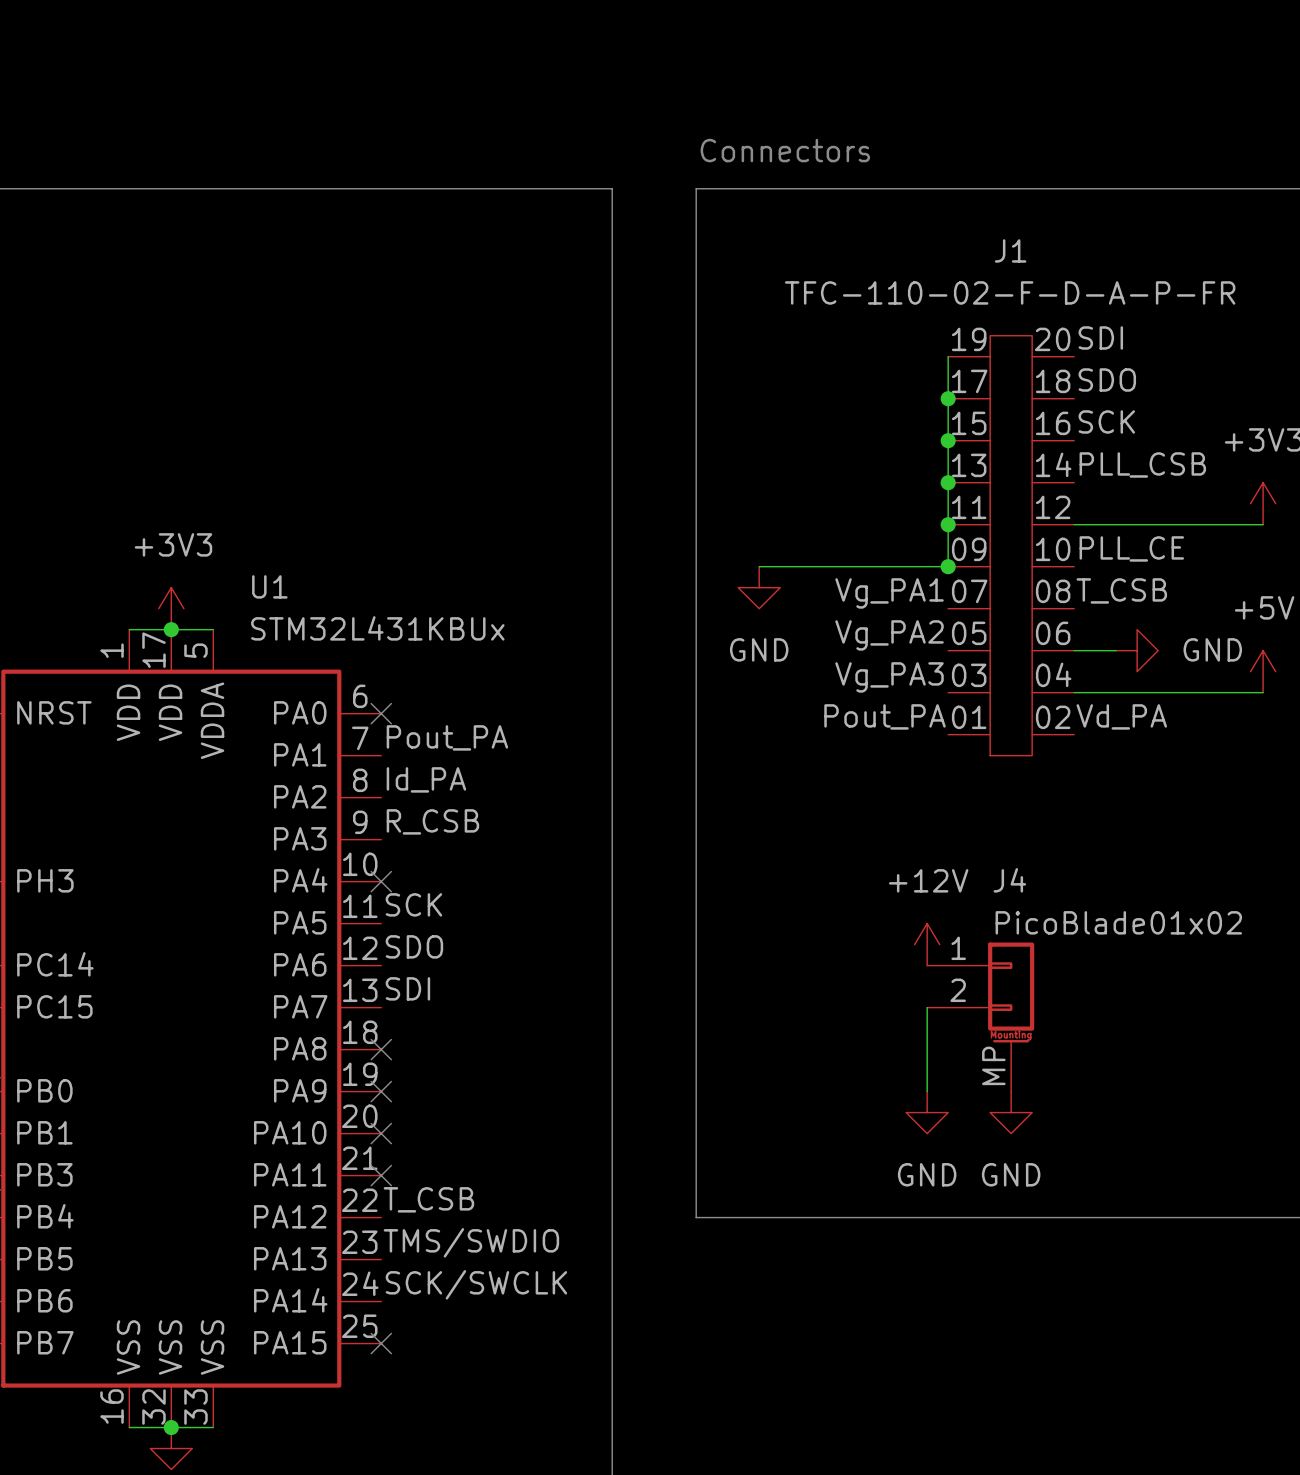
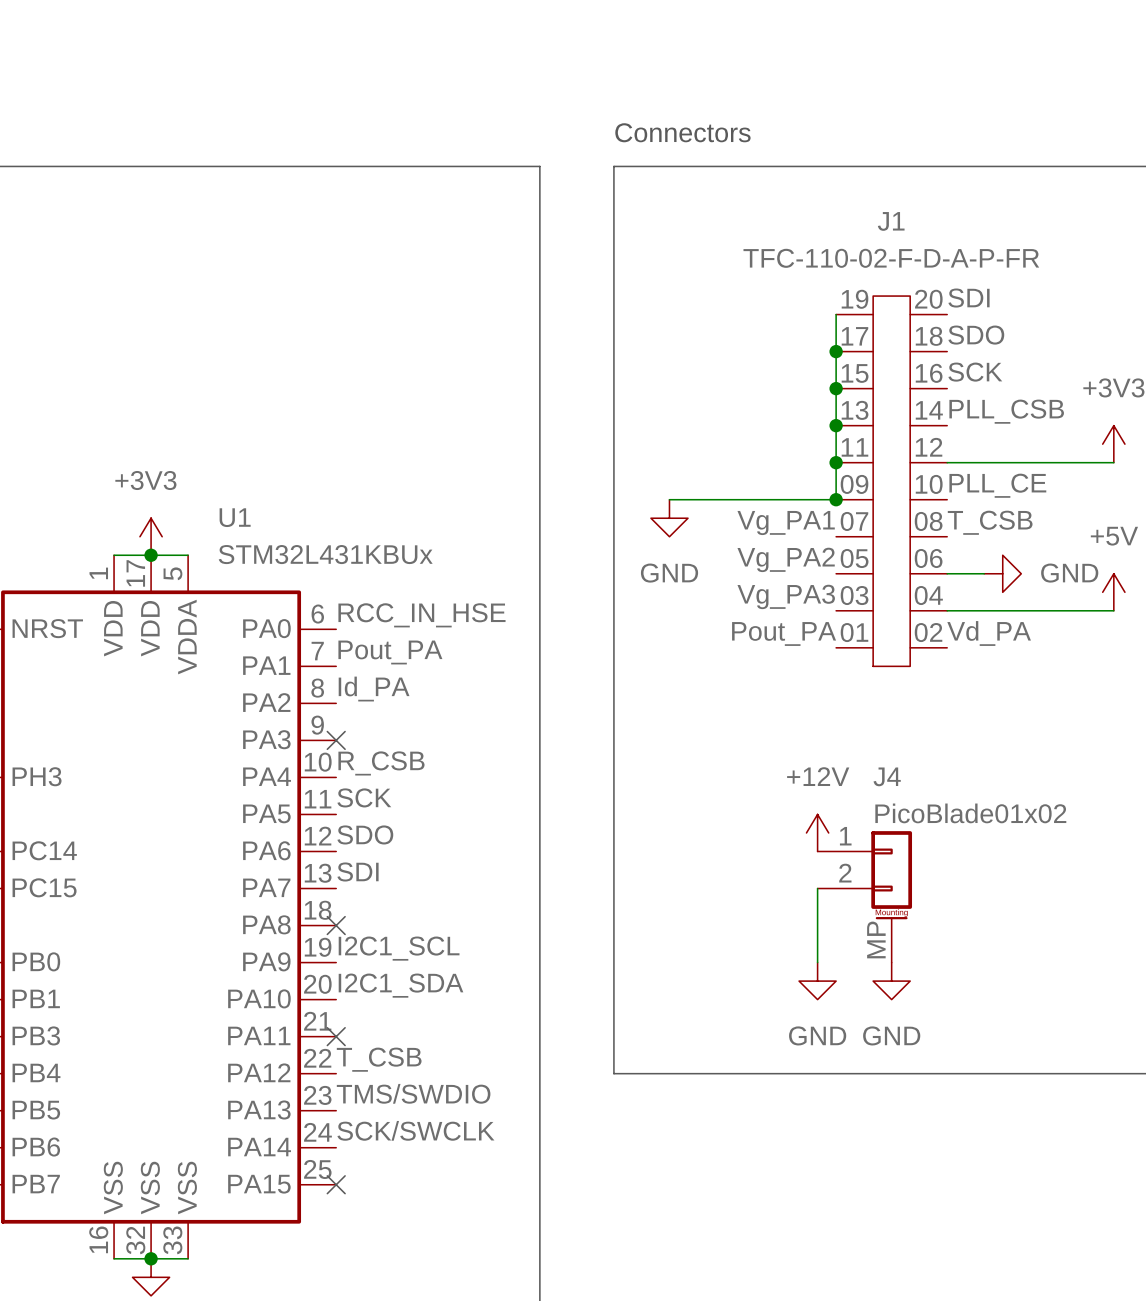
label: none -> RCC_IN_HSE (421, 615)
no-connect mark: (381, 713) -> none
label position: R_CSB (432, 821) -> R_CSB (381, 763)
no-connect mark position: (381, 881) -> (336, 740)
label: none -> I2C1_SCL (399, 948)
no-connect mark: (381, 1091) -> none
label: none -> I2C1_SDA (401, 985)
no-connect mark: (381, 1133) -> none

